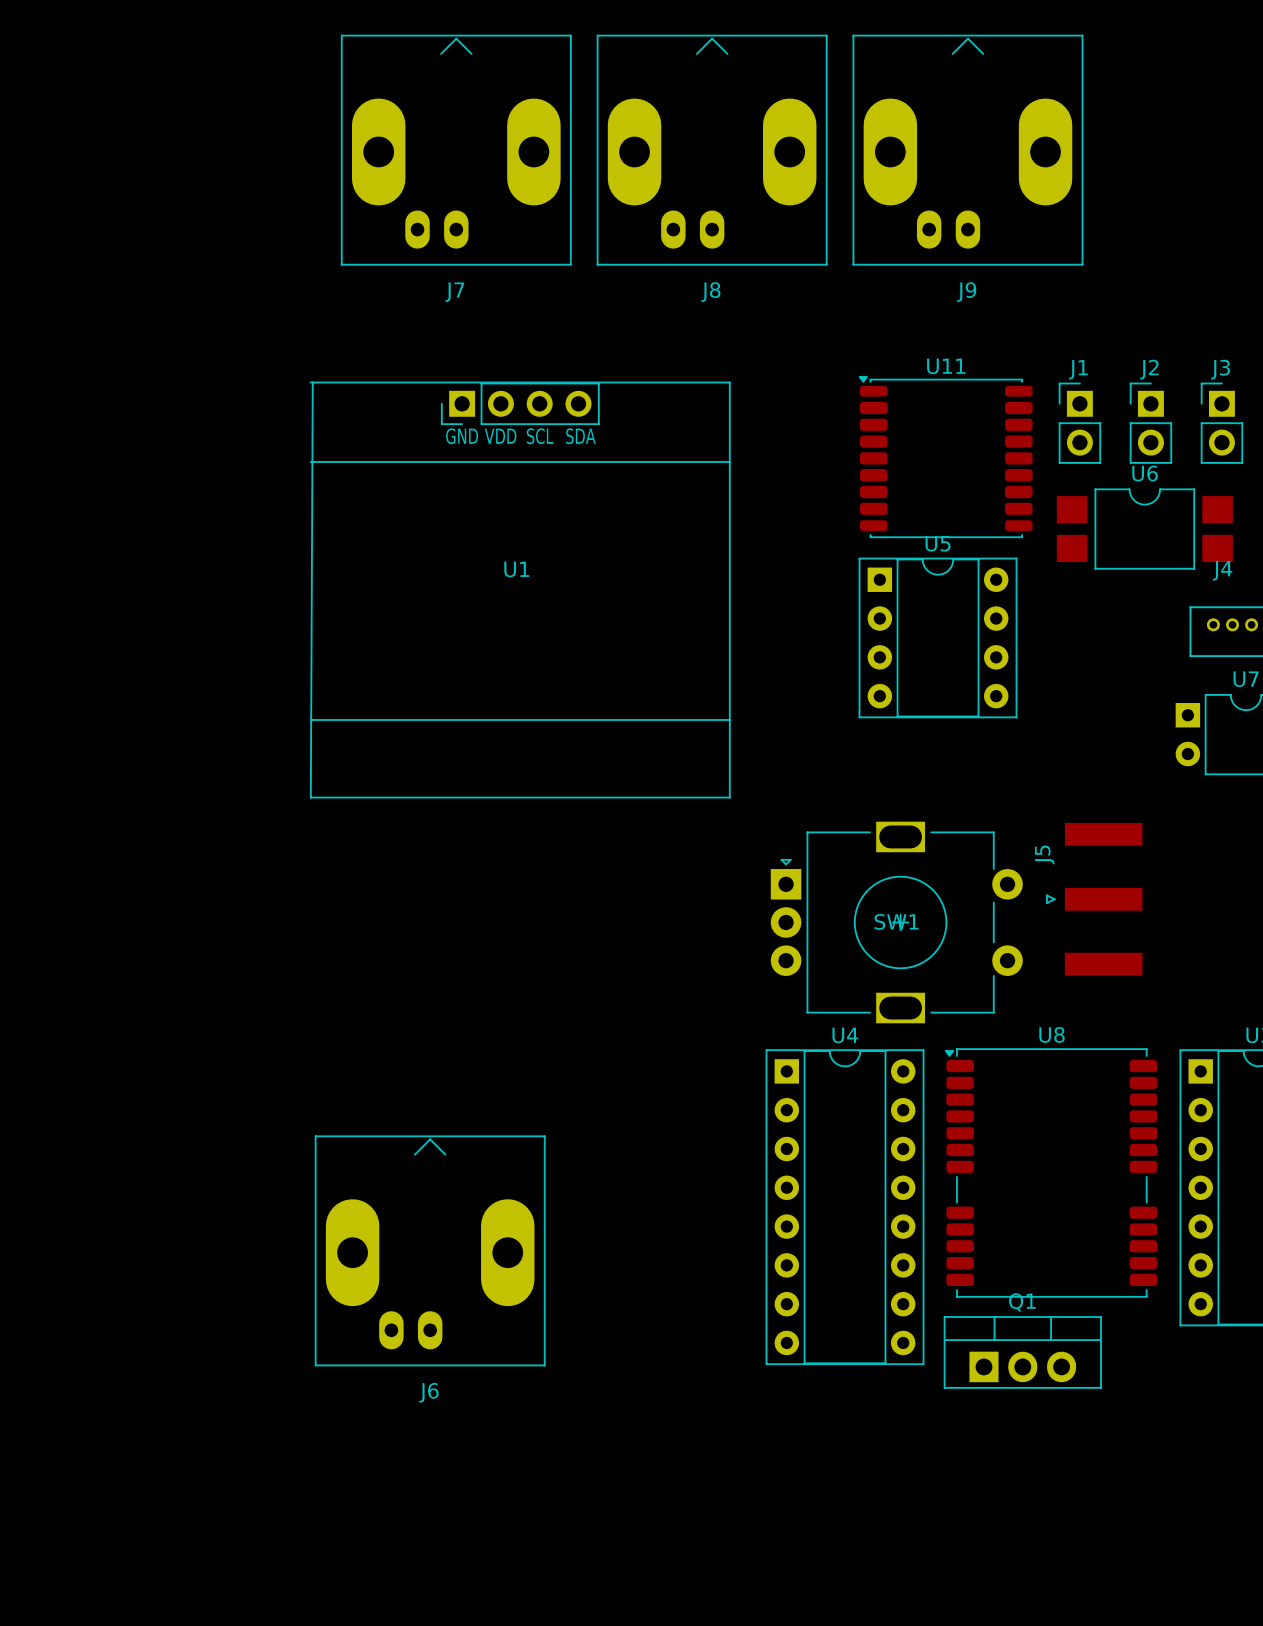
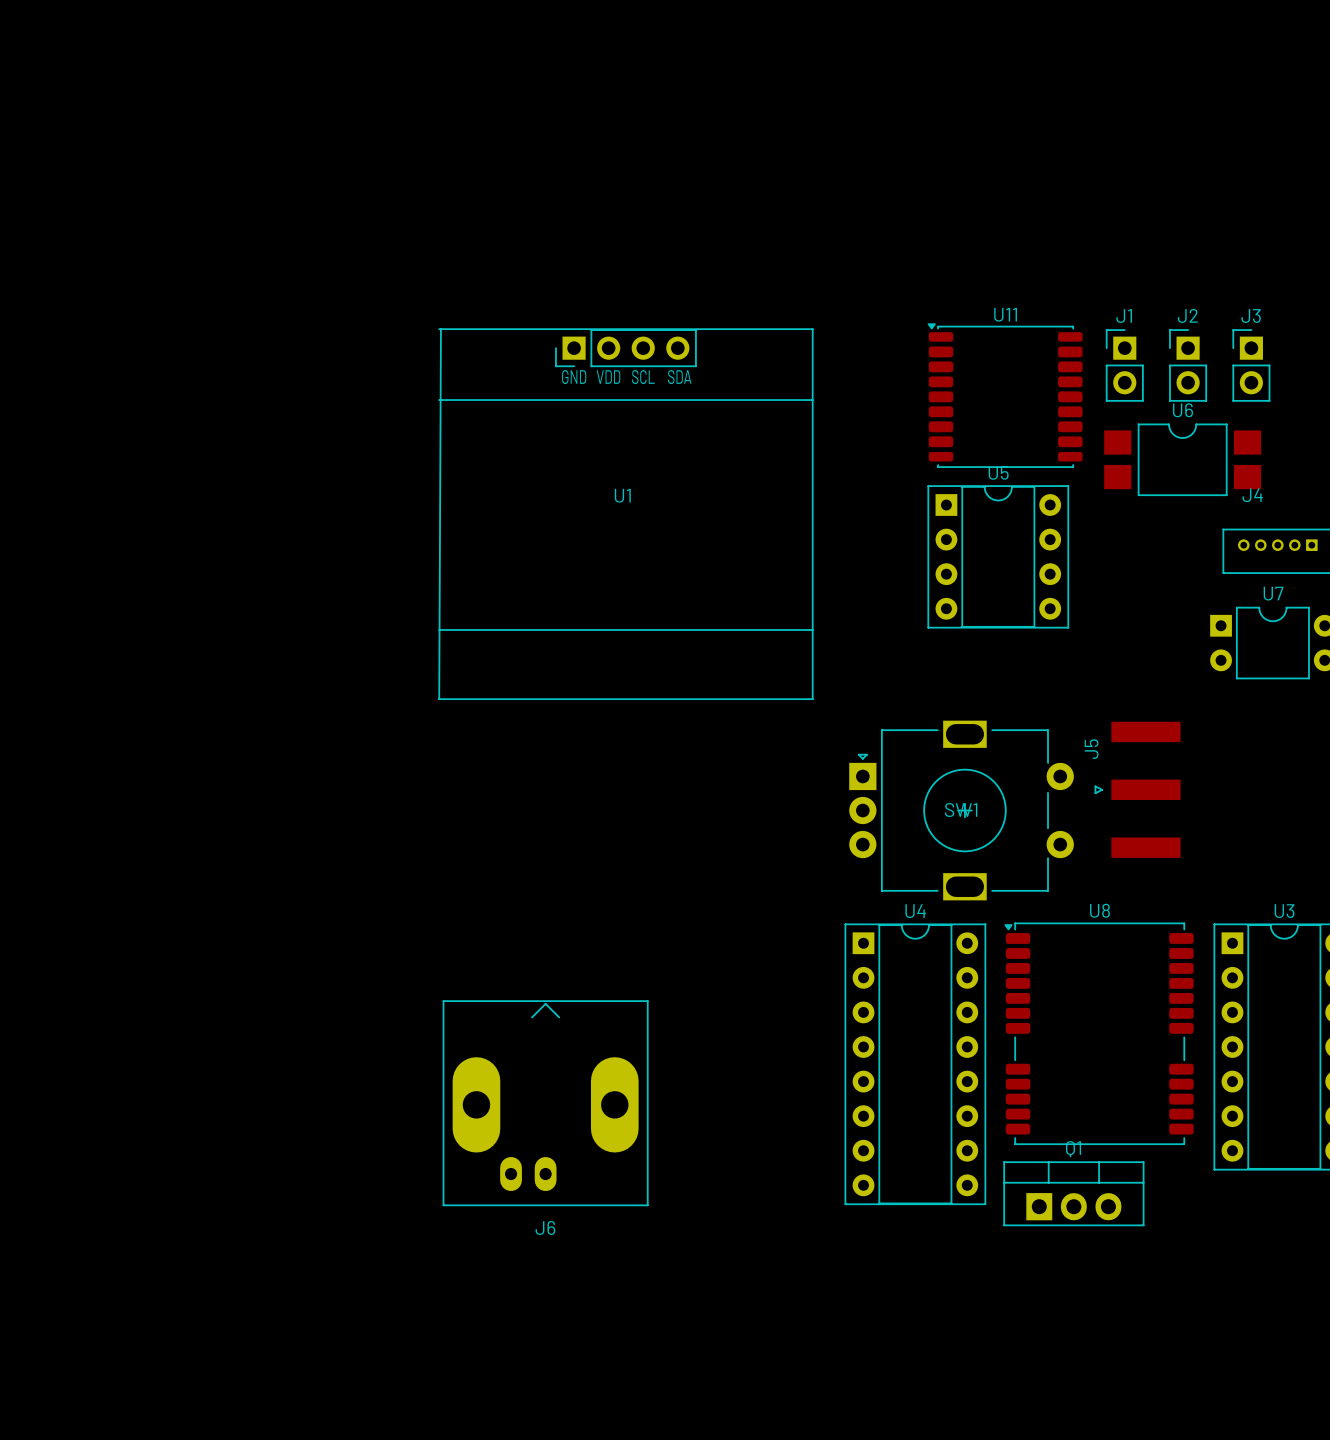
J7: (456, 150) -> none
J8: (712, 150) -> none
J9: (967, 150) -> none

